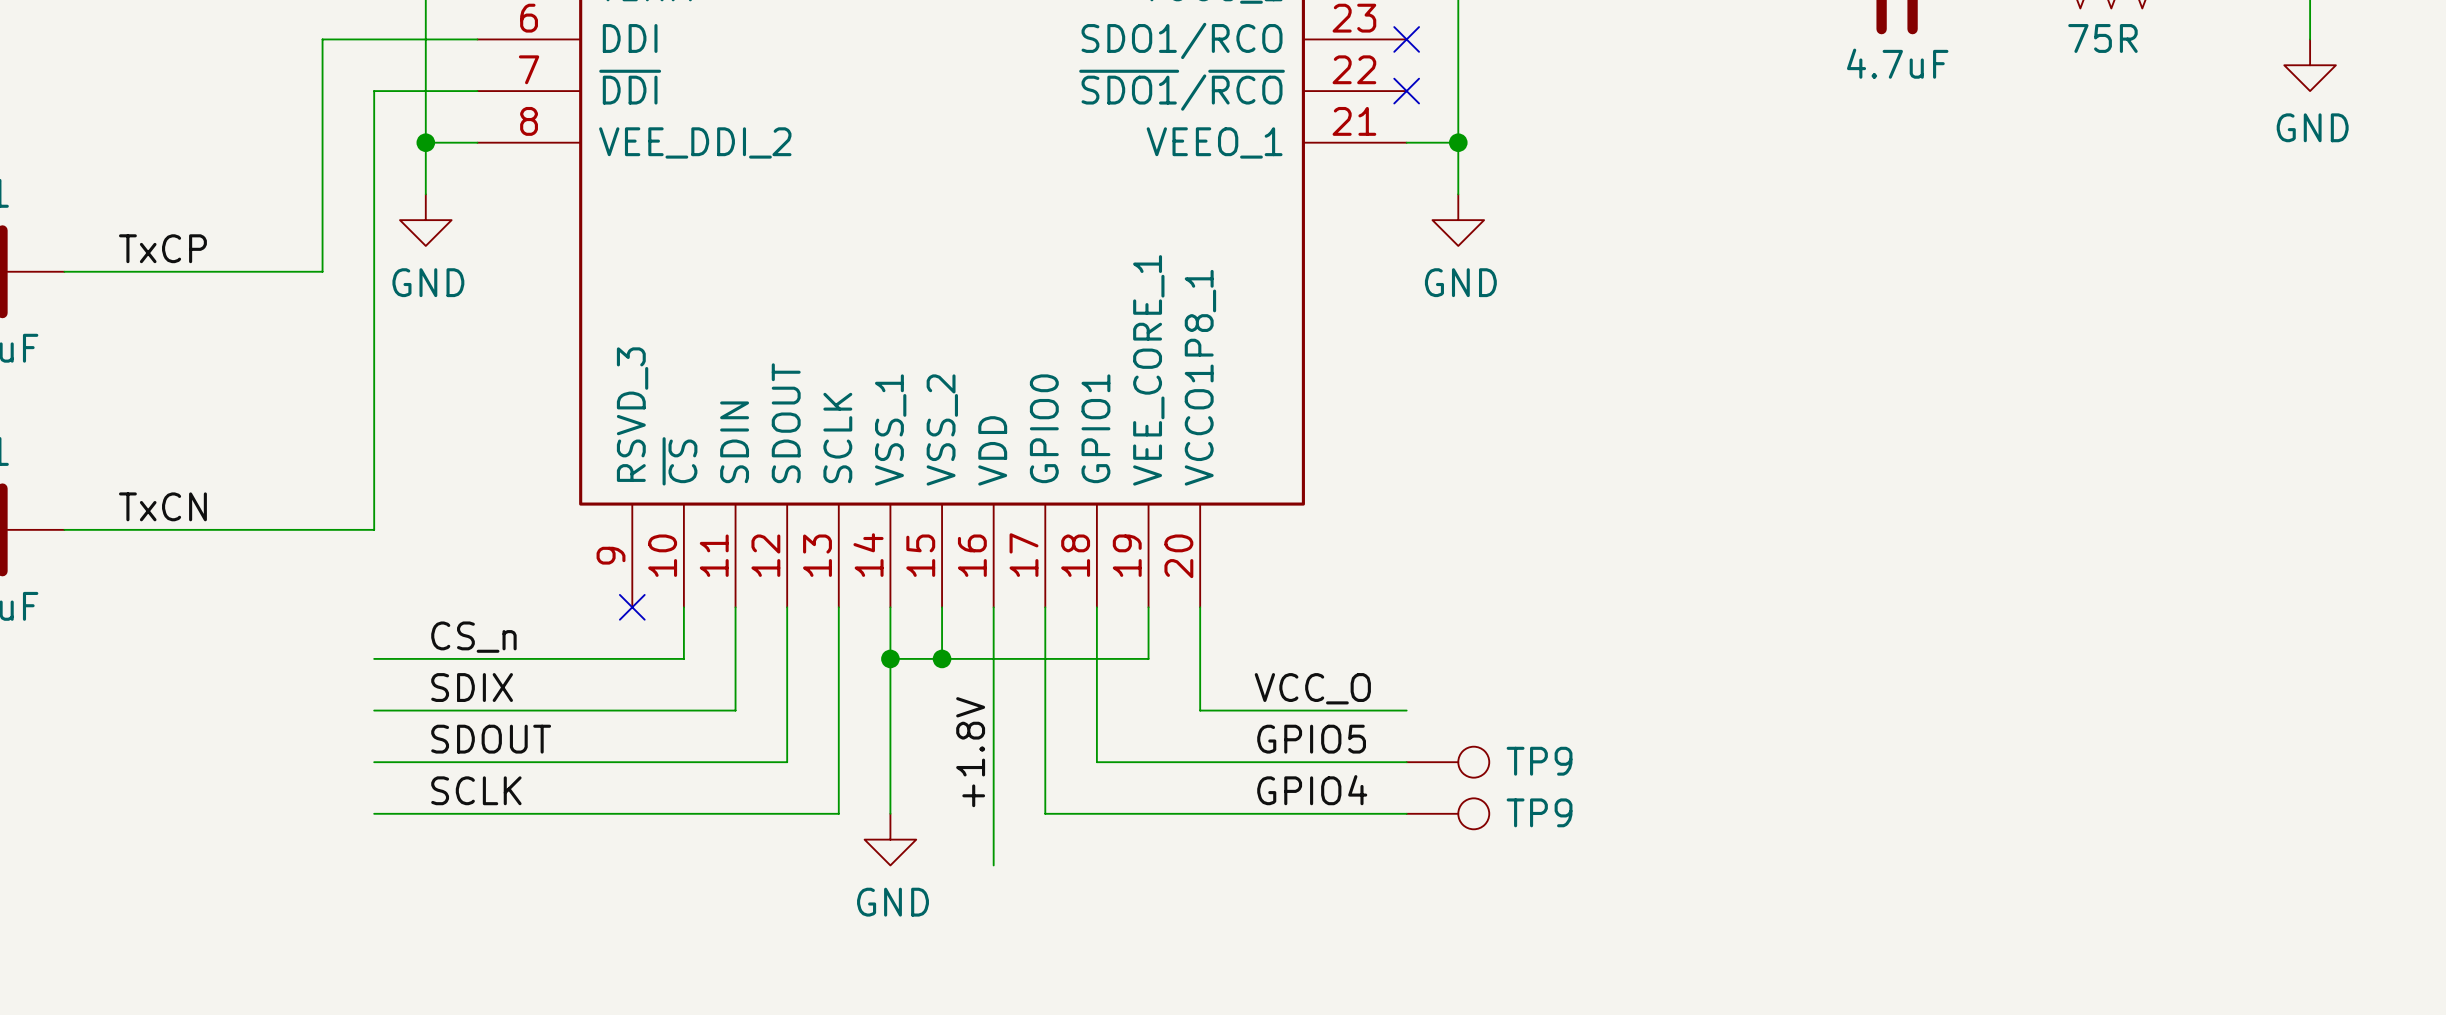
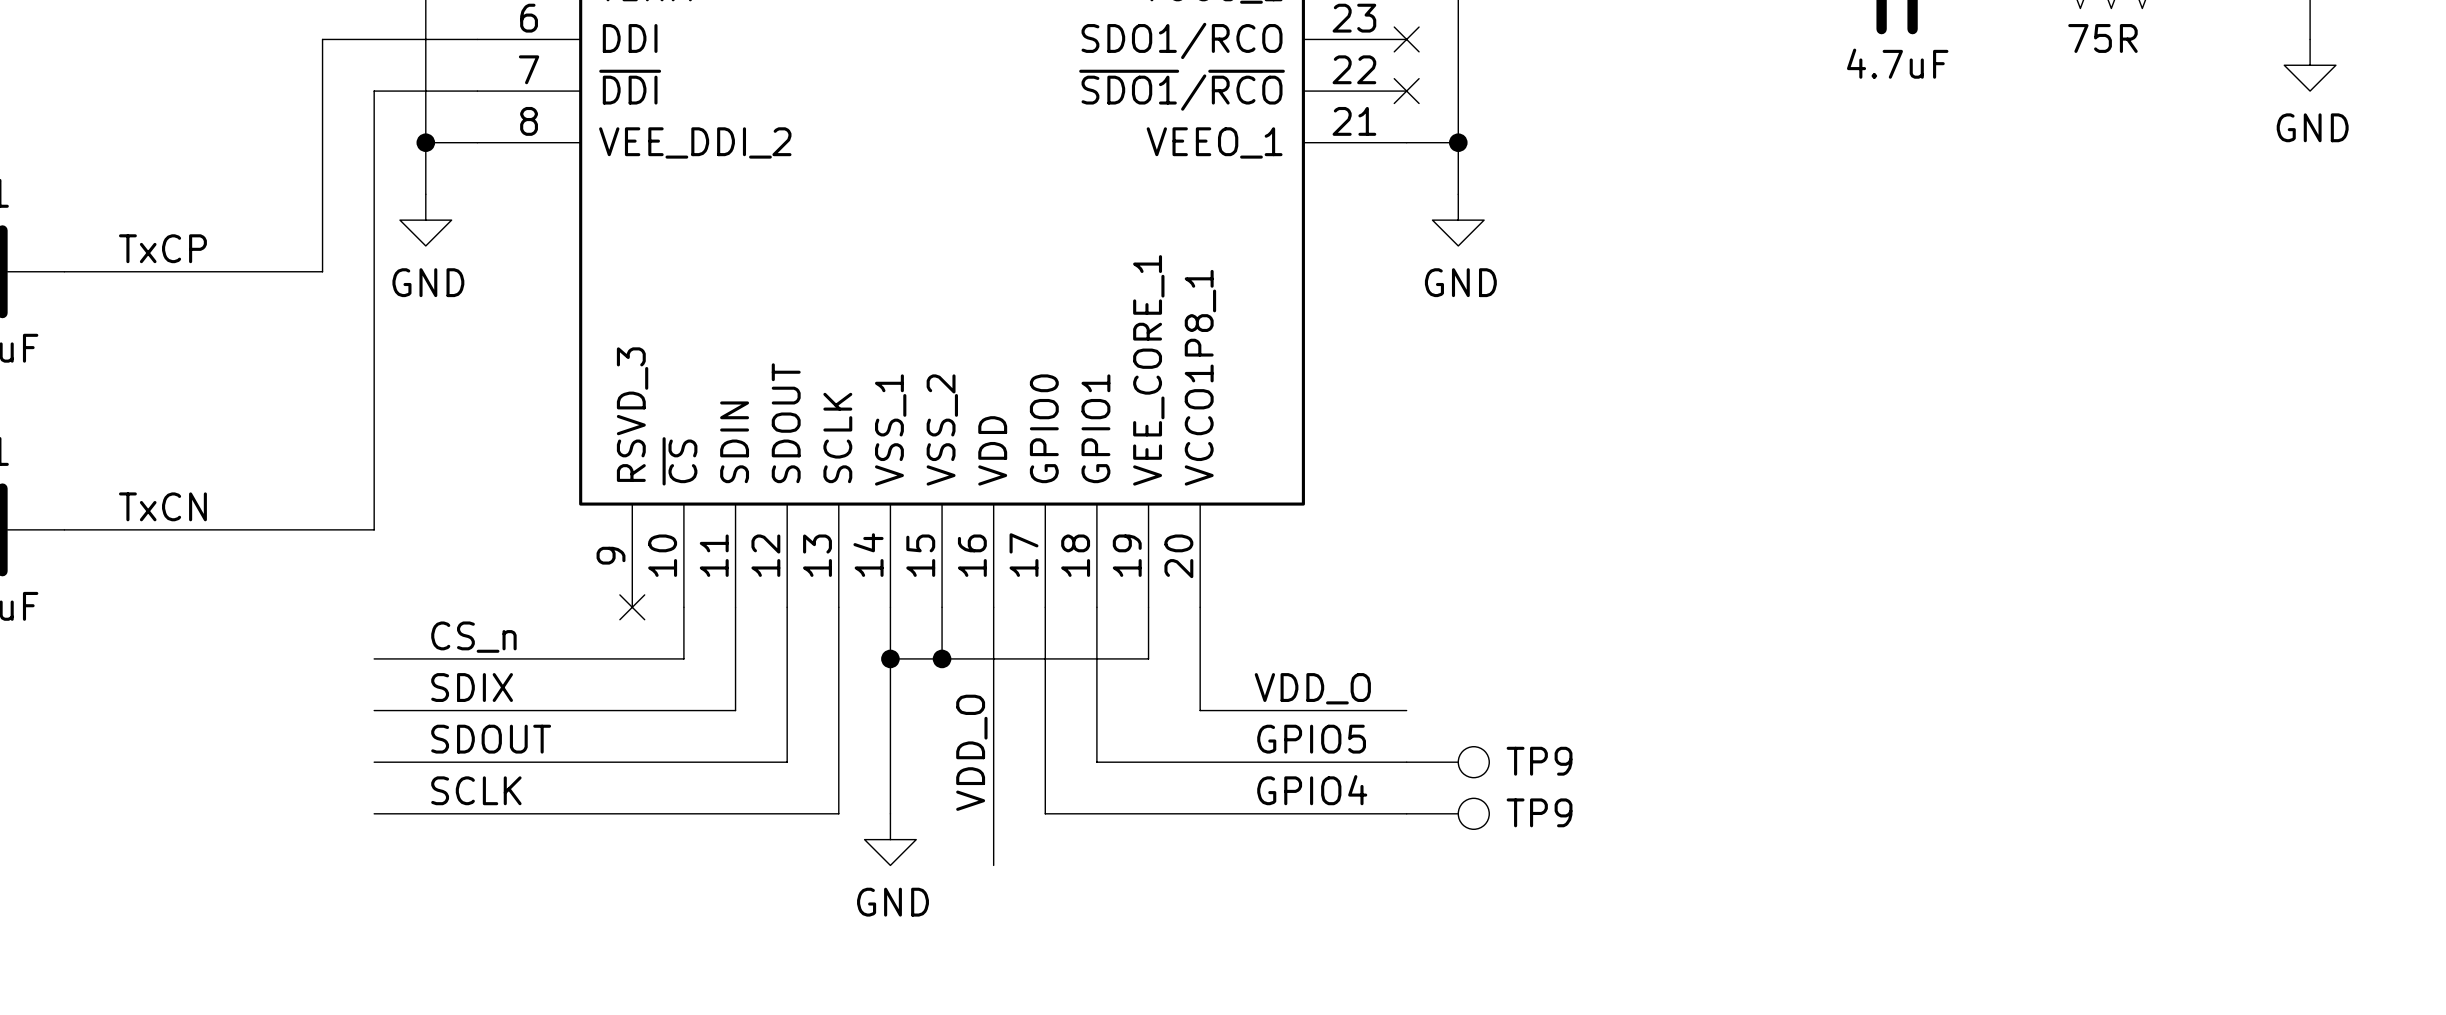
label: VCC_O (1312, 688) -> VDD_O (1312, 688)
label: +1.8V (970, 752) -> VDD_O (971, 752)

